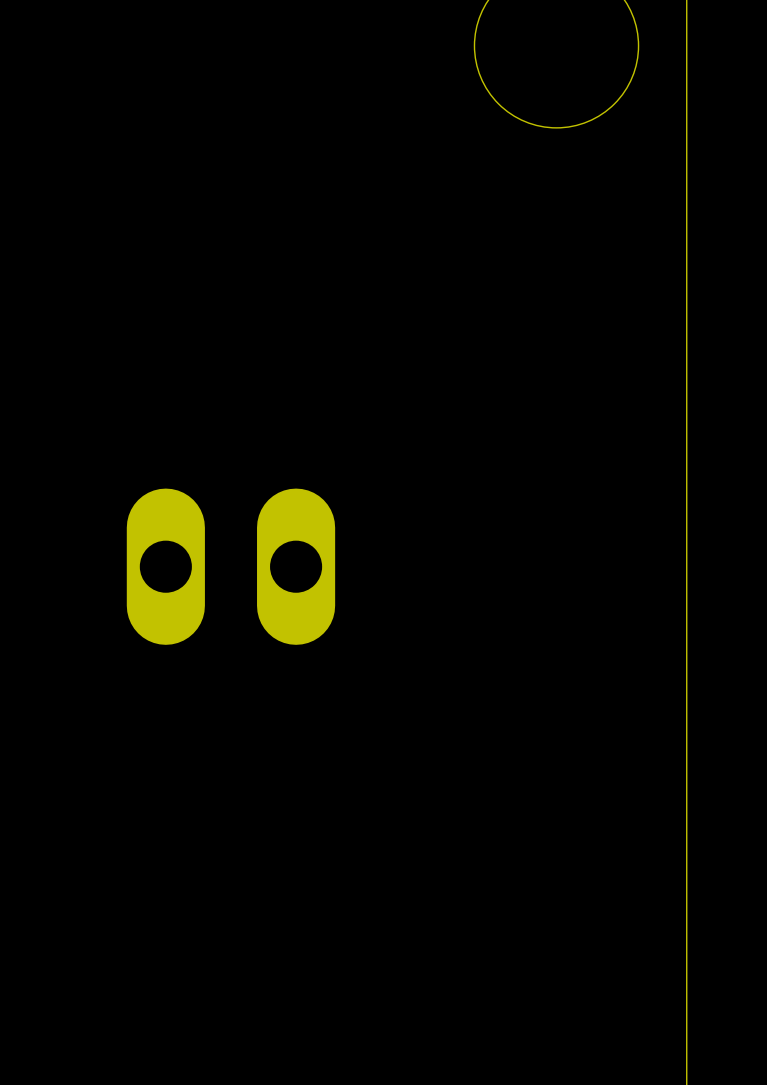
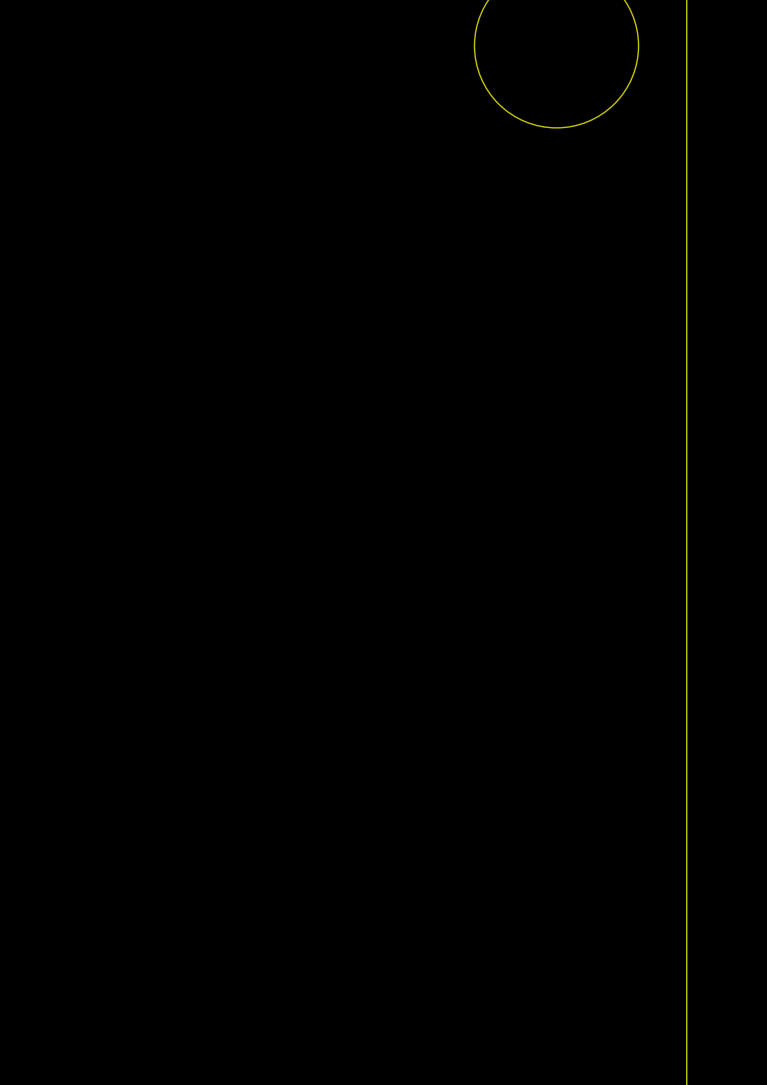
part: (230, 566) -> none

